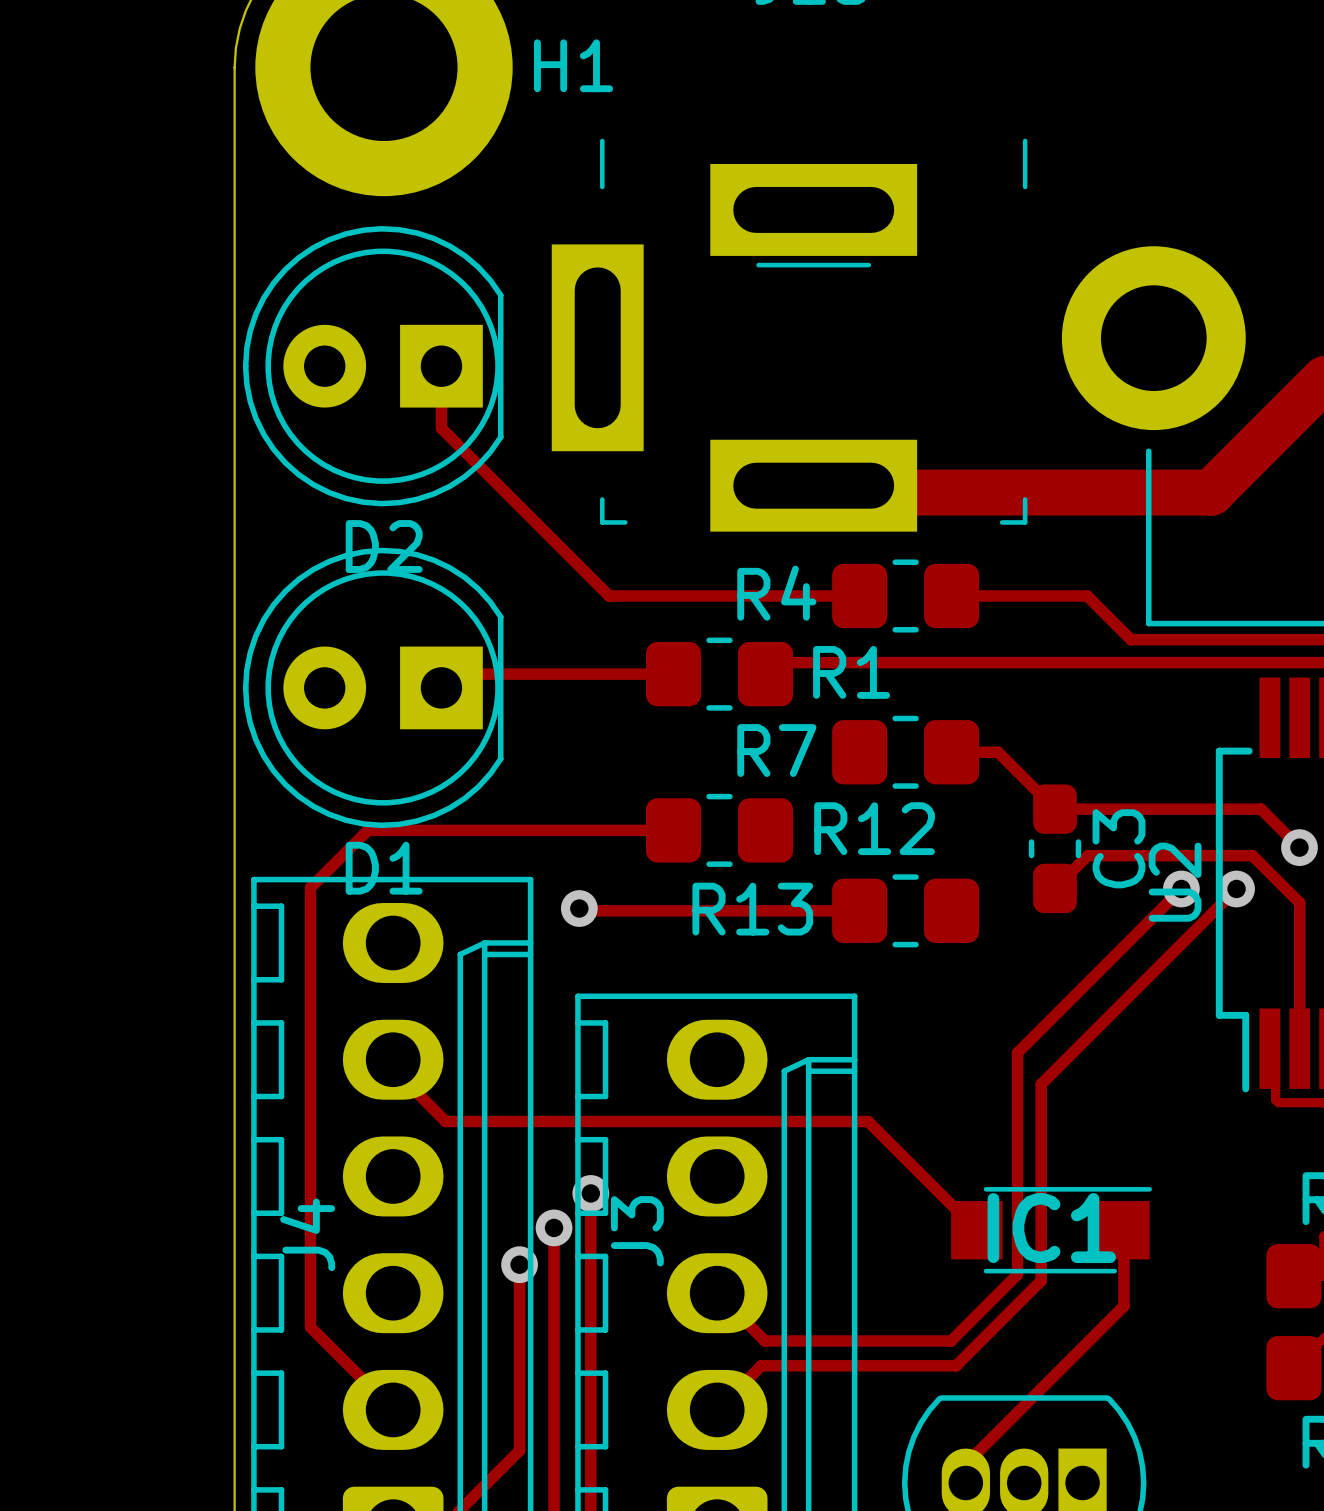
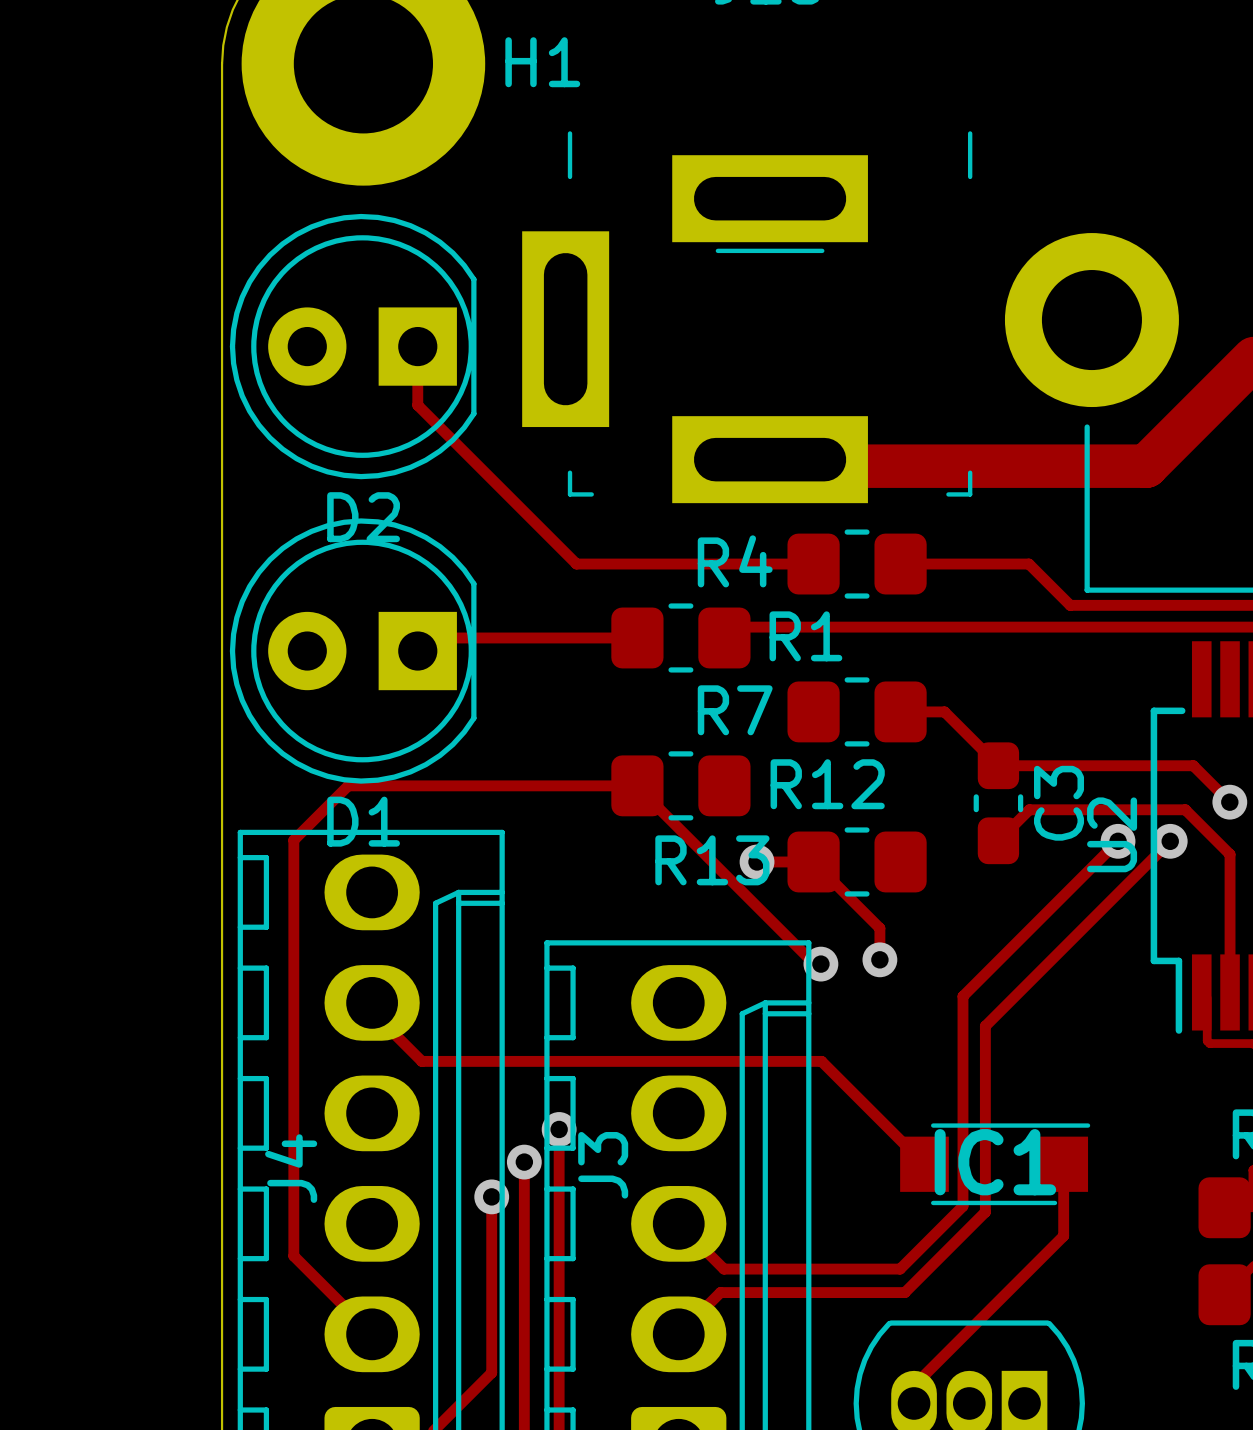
track: none -> (637, 786) (814, 964) (820, 964)
track: (579, 908) (581, 910) (799, 910) -> none
via: (579, 908) -> none
via: none -> (757, 861)
track: none -> (813, 861) (879, 928) (879, 959)
via: none -> (879, 959)
via: none -> (820, 964)

